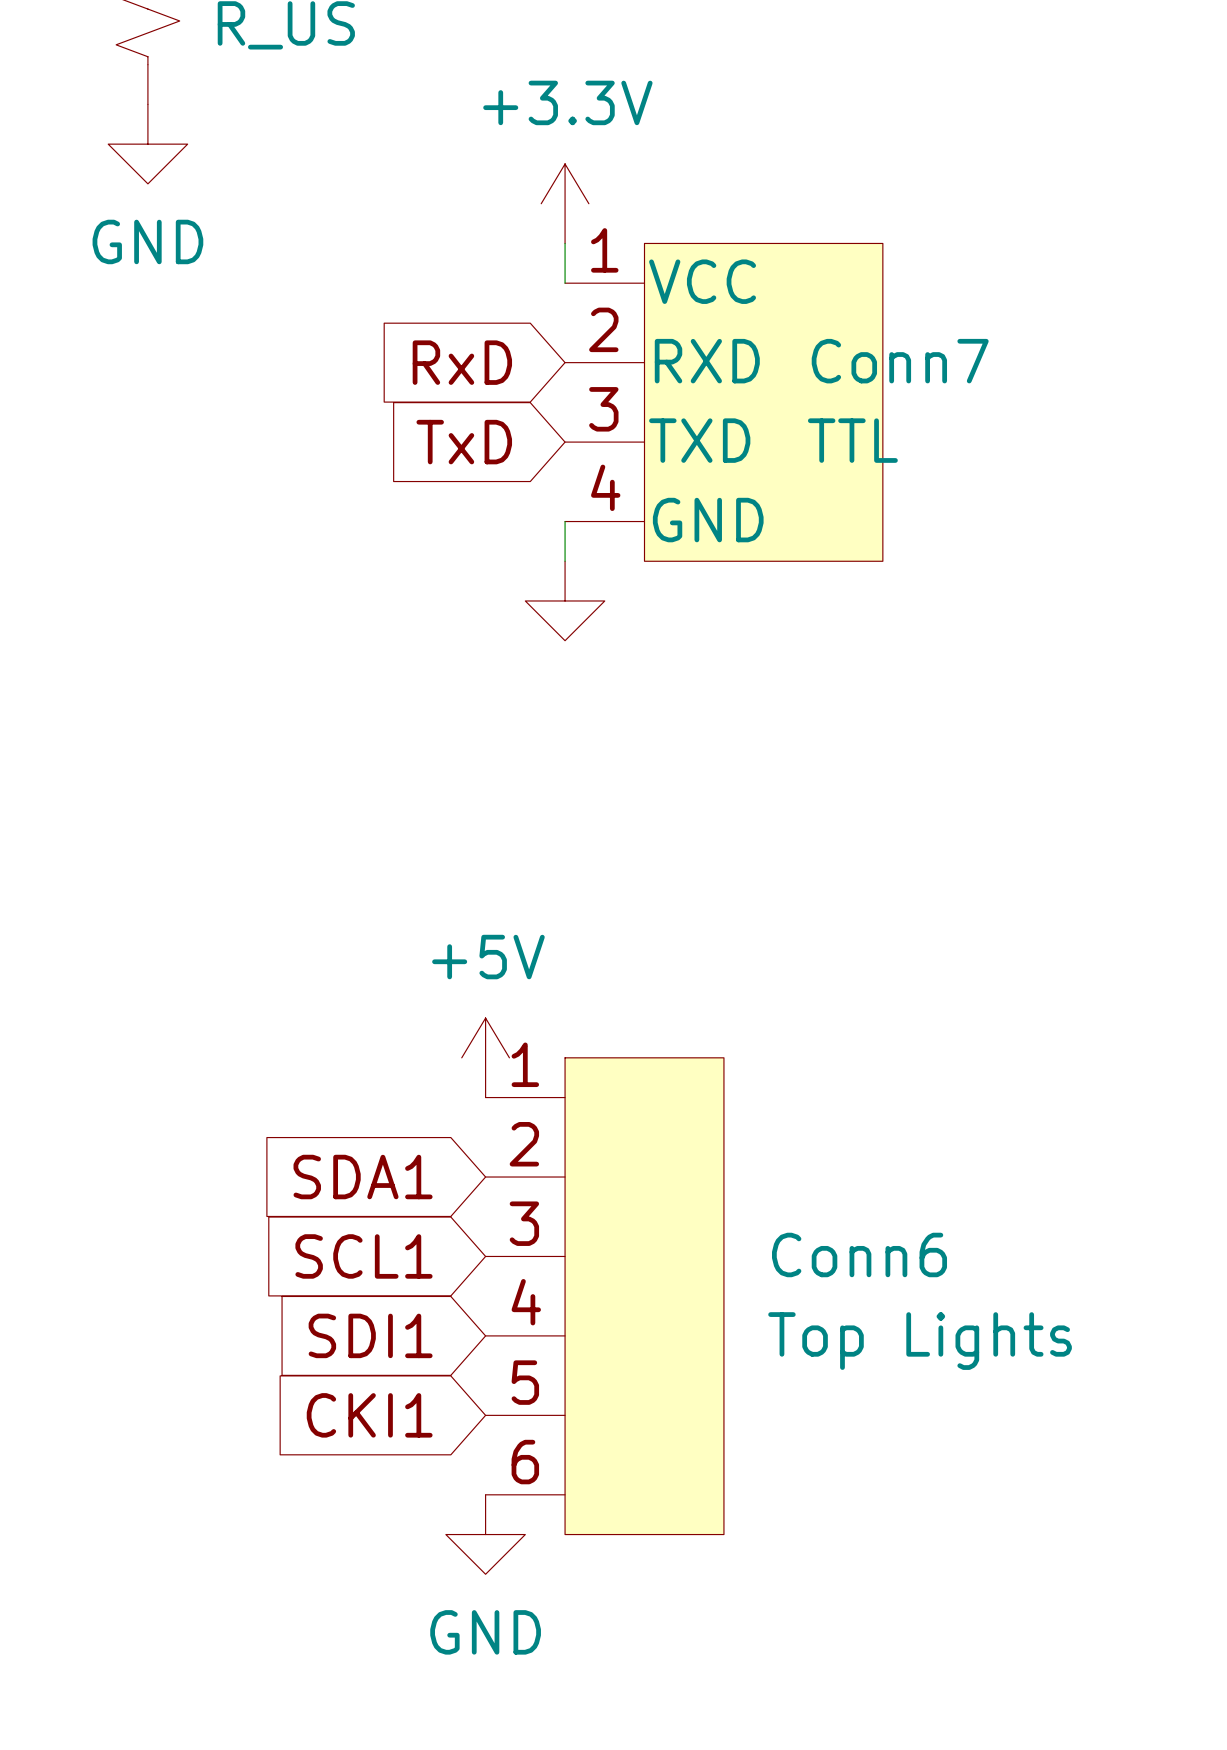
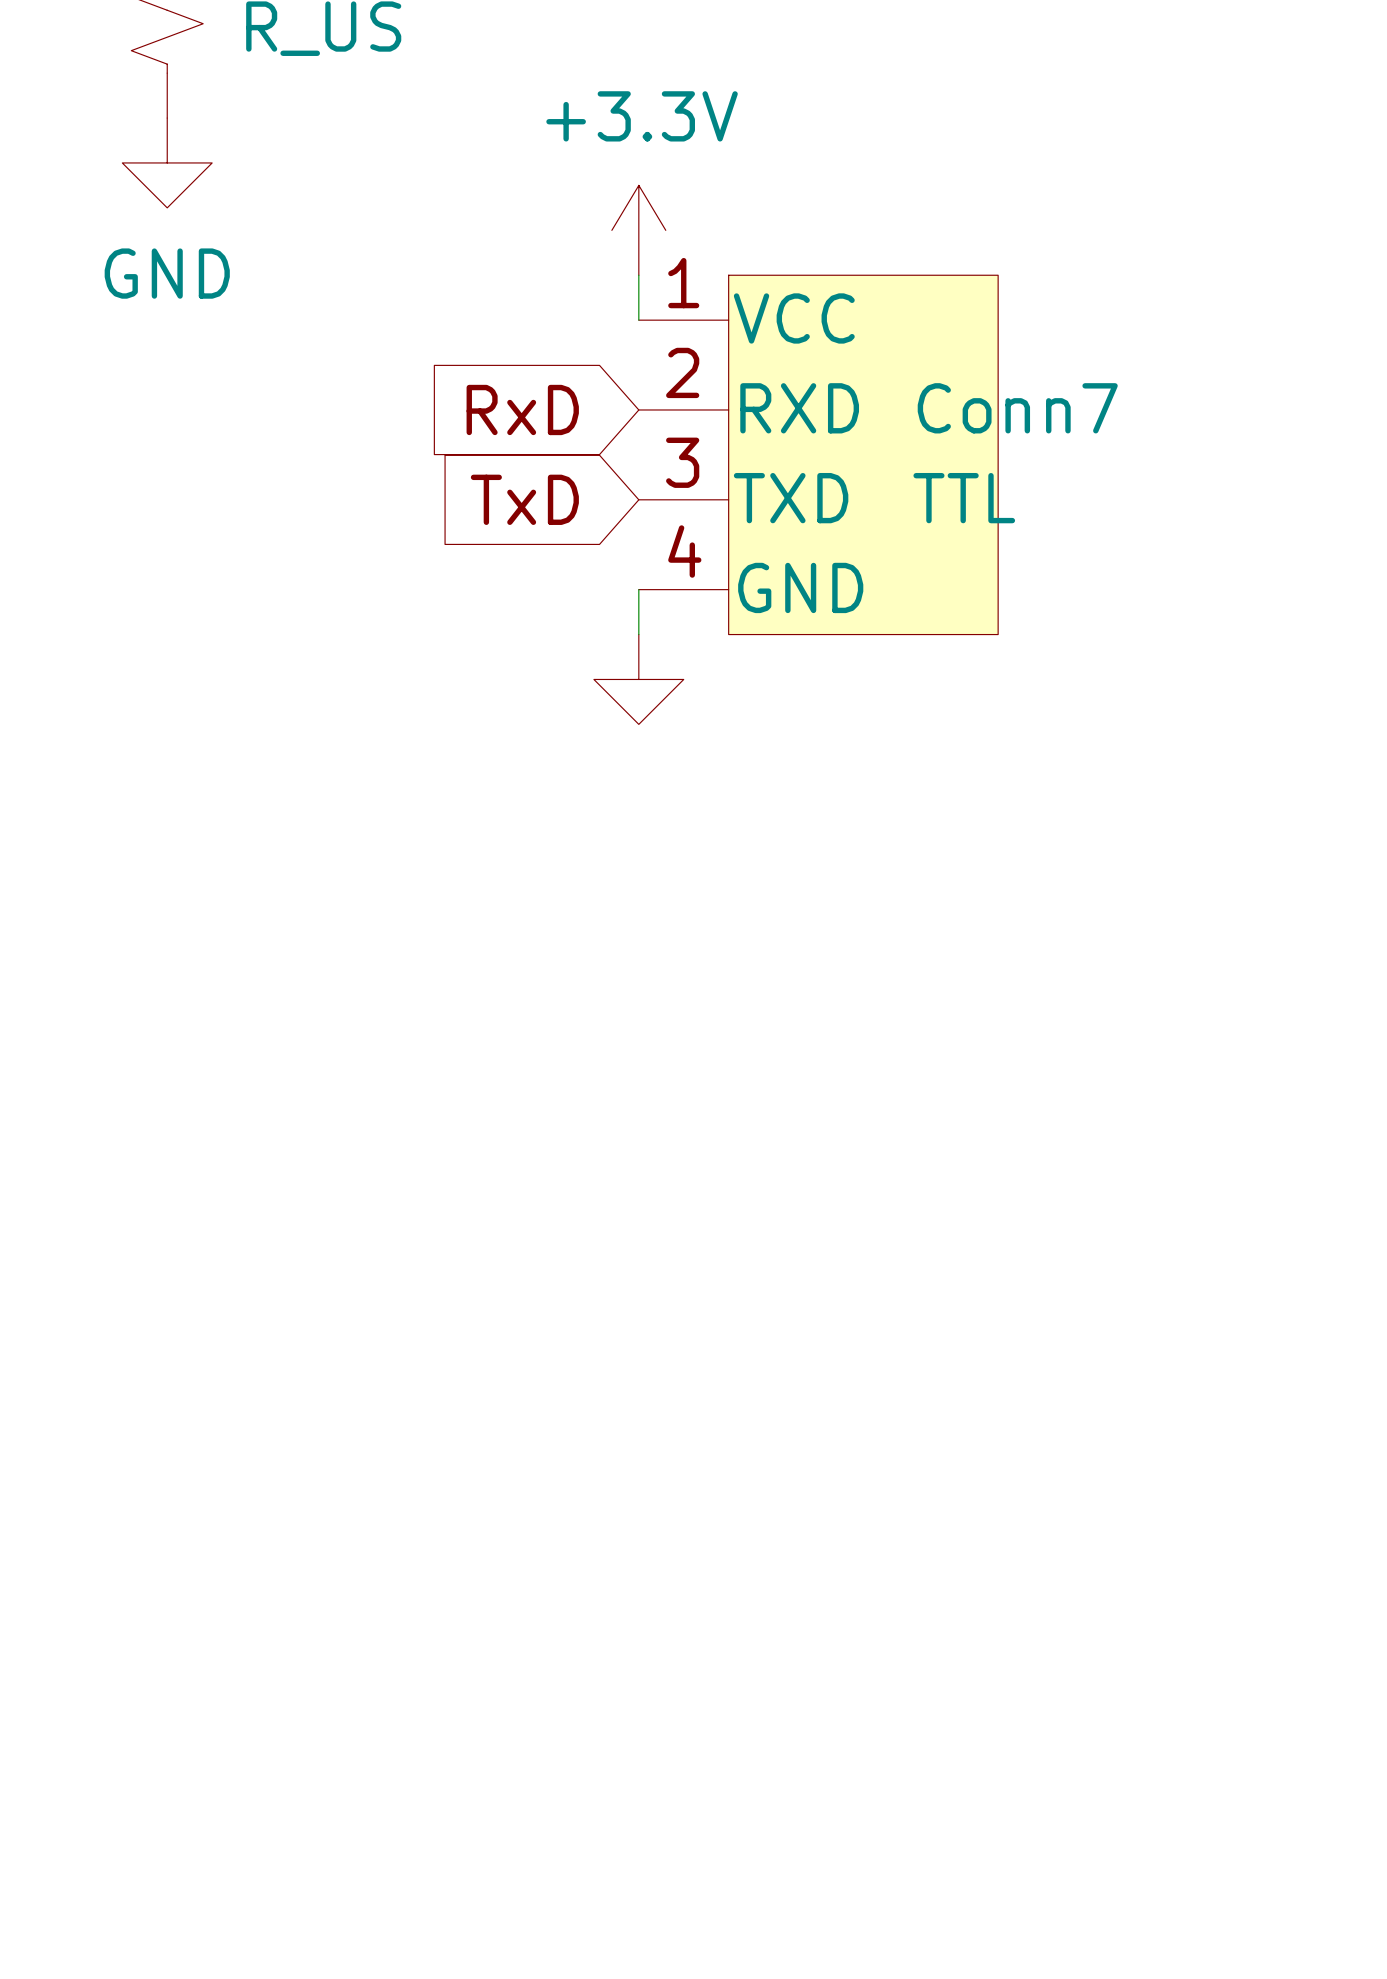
power symbol: +5V (485, 1057) -> none
global label: SDA1 (363, 1177) -> none
global label: SCL1 (363, 1256) -> none
Conn6: Top Lights (604, 1296) -> none
global label: SDI1 (370, 1335) -> none
global label: CKI1 (369, 1415) -> none
power symbol: GND (485, 1534) -> none

